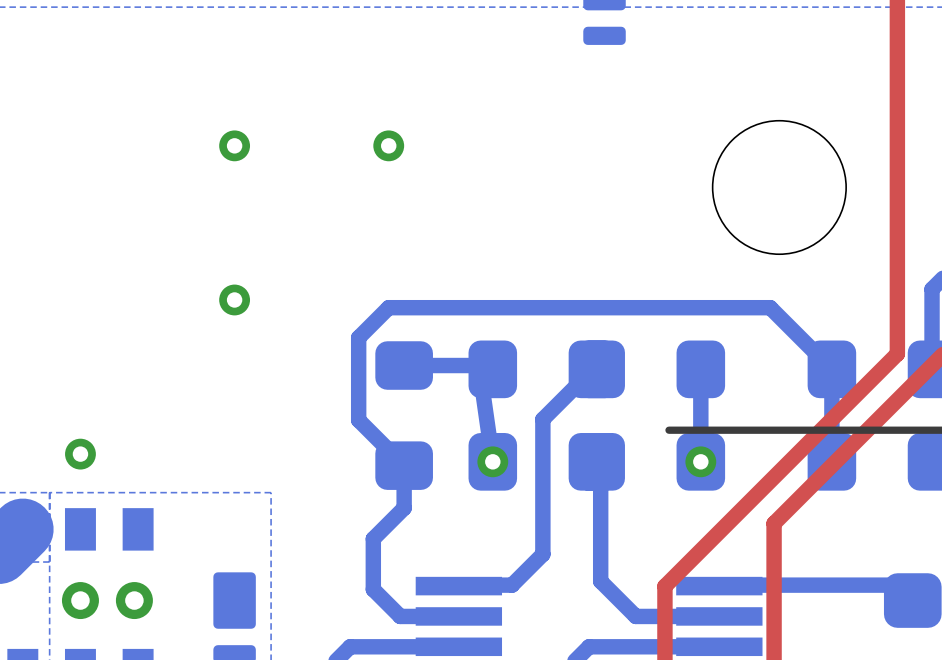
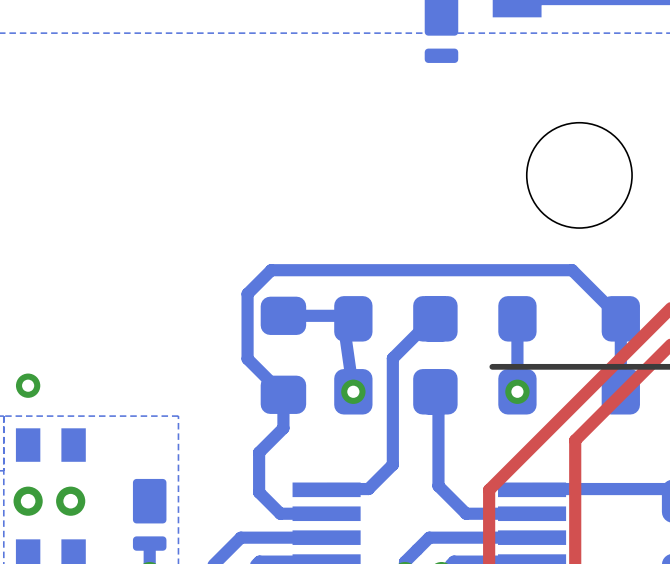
via: (234, 145) -> none
via: (388, 145) -> none
via: (234, 299) -> none

